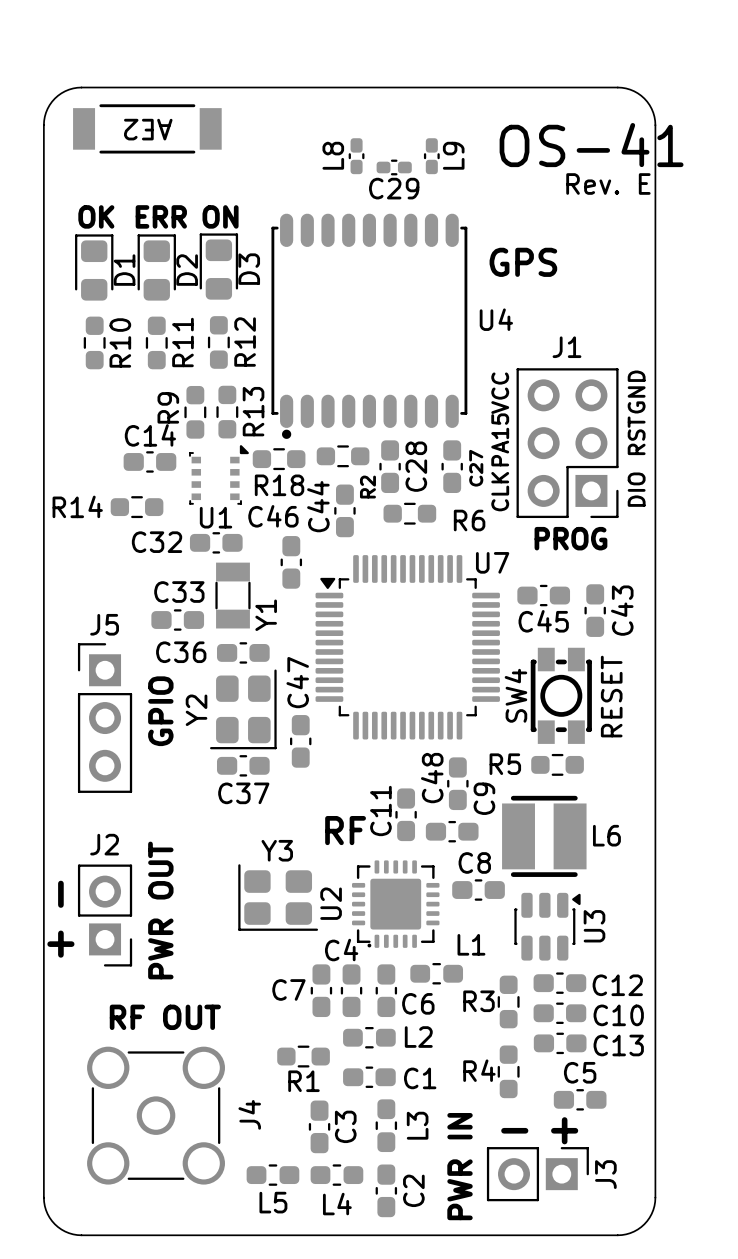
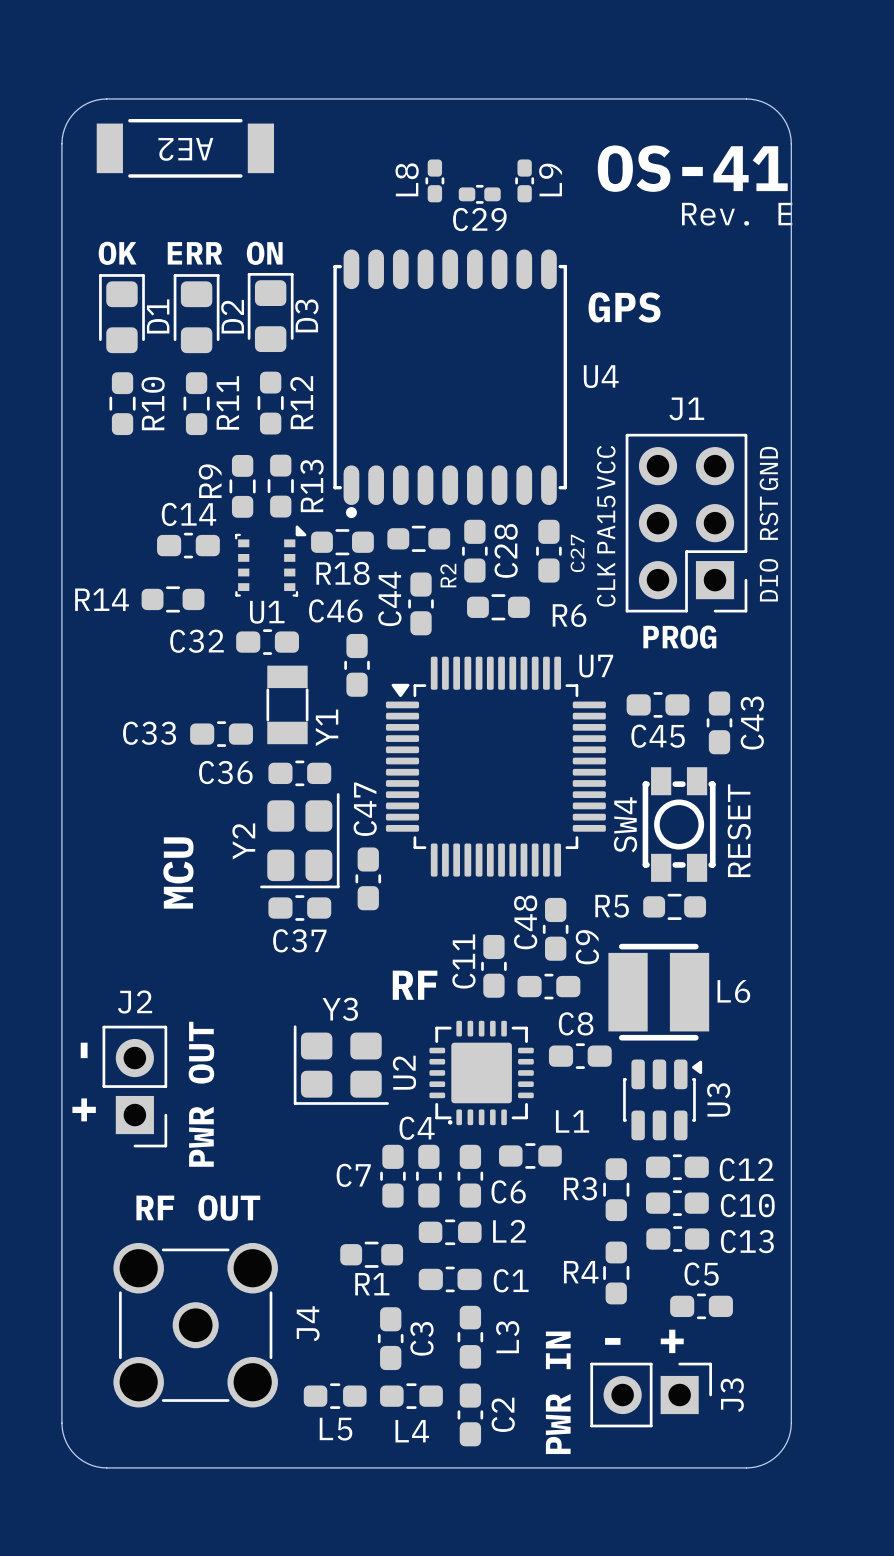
C33 name position: C33 (179, 592) -> C33 (149, 733)
text: GPIO (160, 711) -> none
J5: (105, 718) -> none
text: none -> MCU (178, 872)

